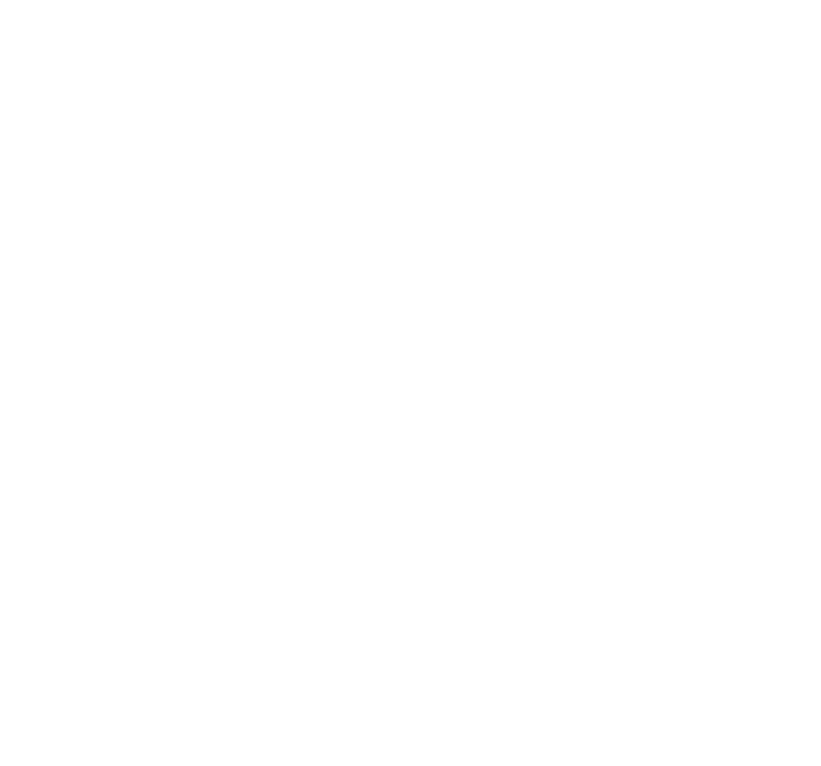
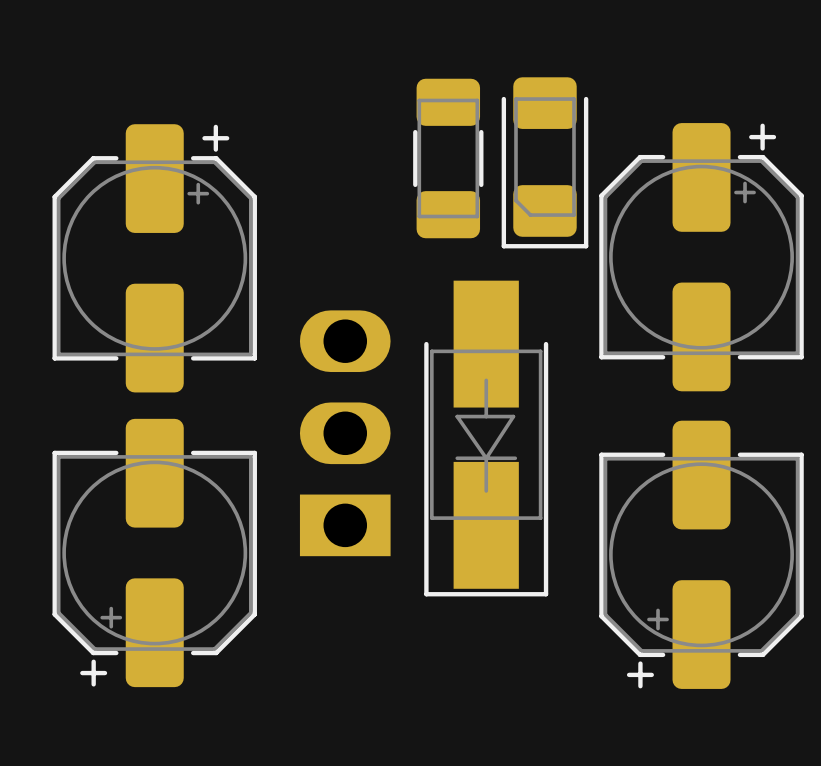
part: none -> (448, 158)
part: none -> (544, 162)
part: none -> (701, 257)
part: none -> (154, 258)
part: none -> (345, 433)
part: none -> (486, 438)
part: none -> (154, 552)
part: none -> (701, 554)

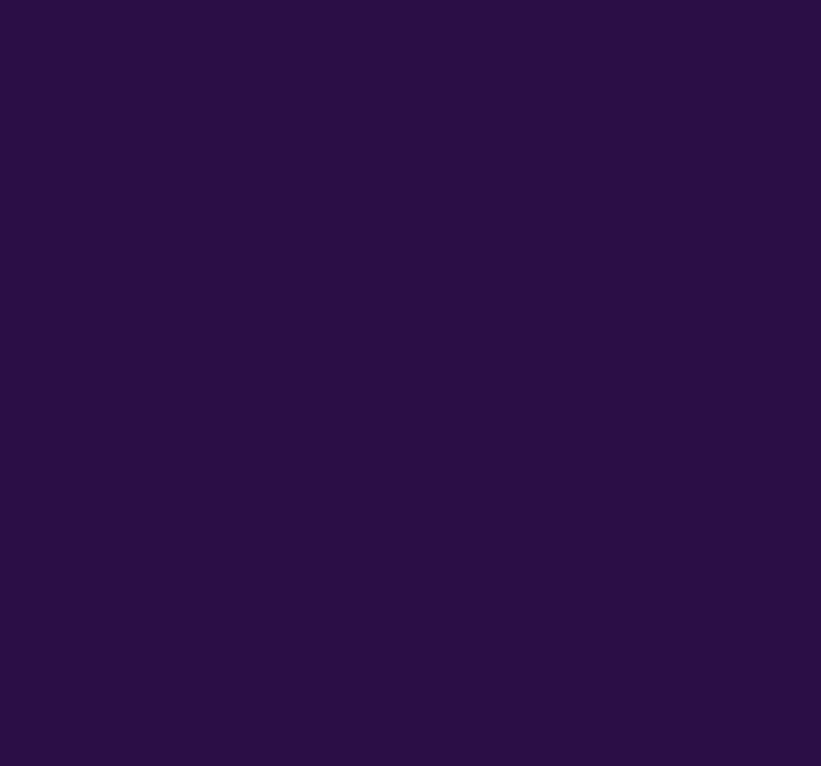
part: (448, 158) -> none
part: (544, 162) -> none
part: (701, 257) -> none
part: (154, 258) -> none
part: (345, 433) -> none
part: (486, 438) -> none
part: (154, 552) -> none
part: (701, 554) -> none

